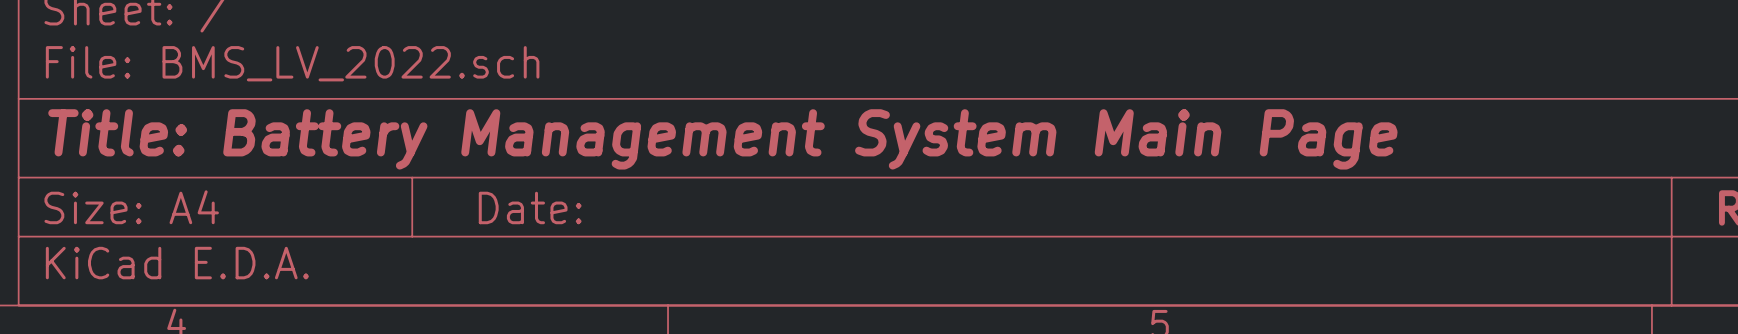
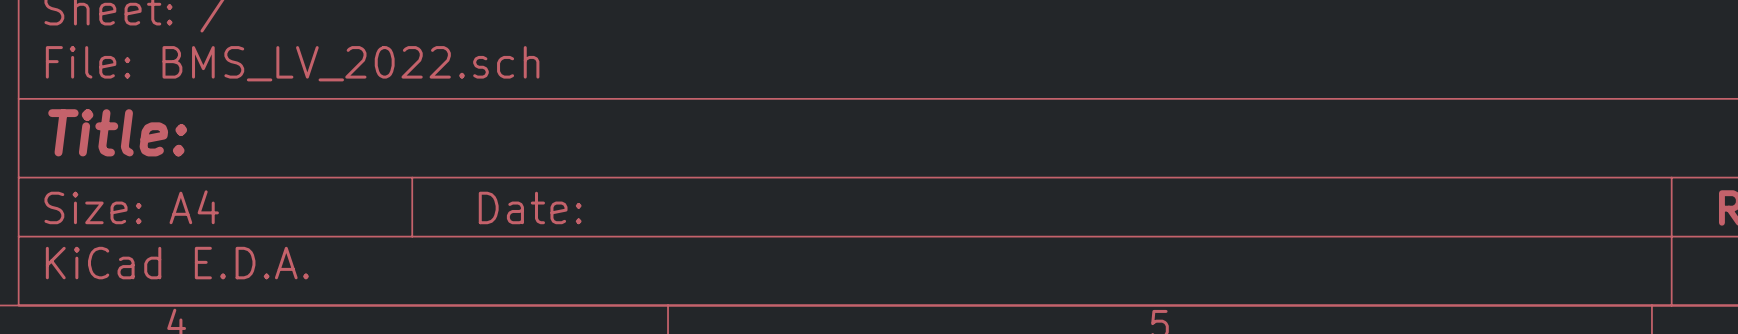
title block: Title: Battery Management System Main Page (722, 139) -> Title: (117, 132)

